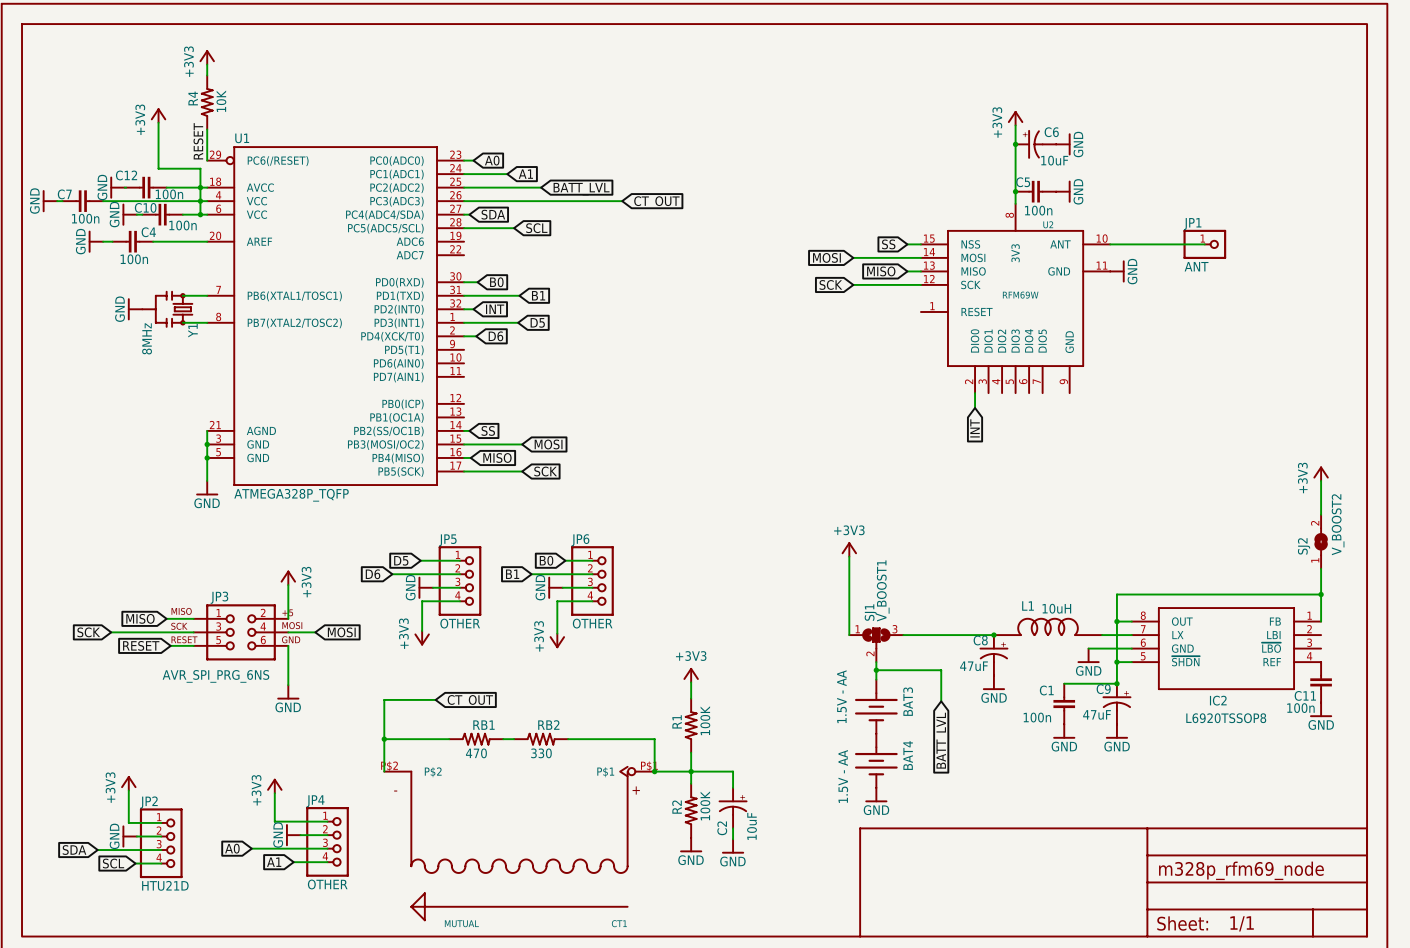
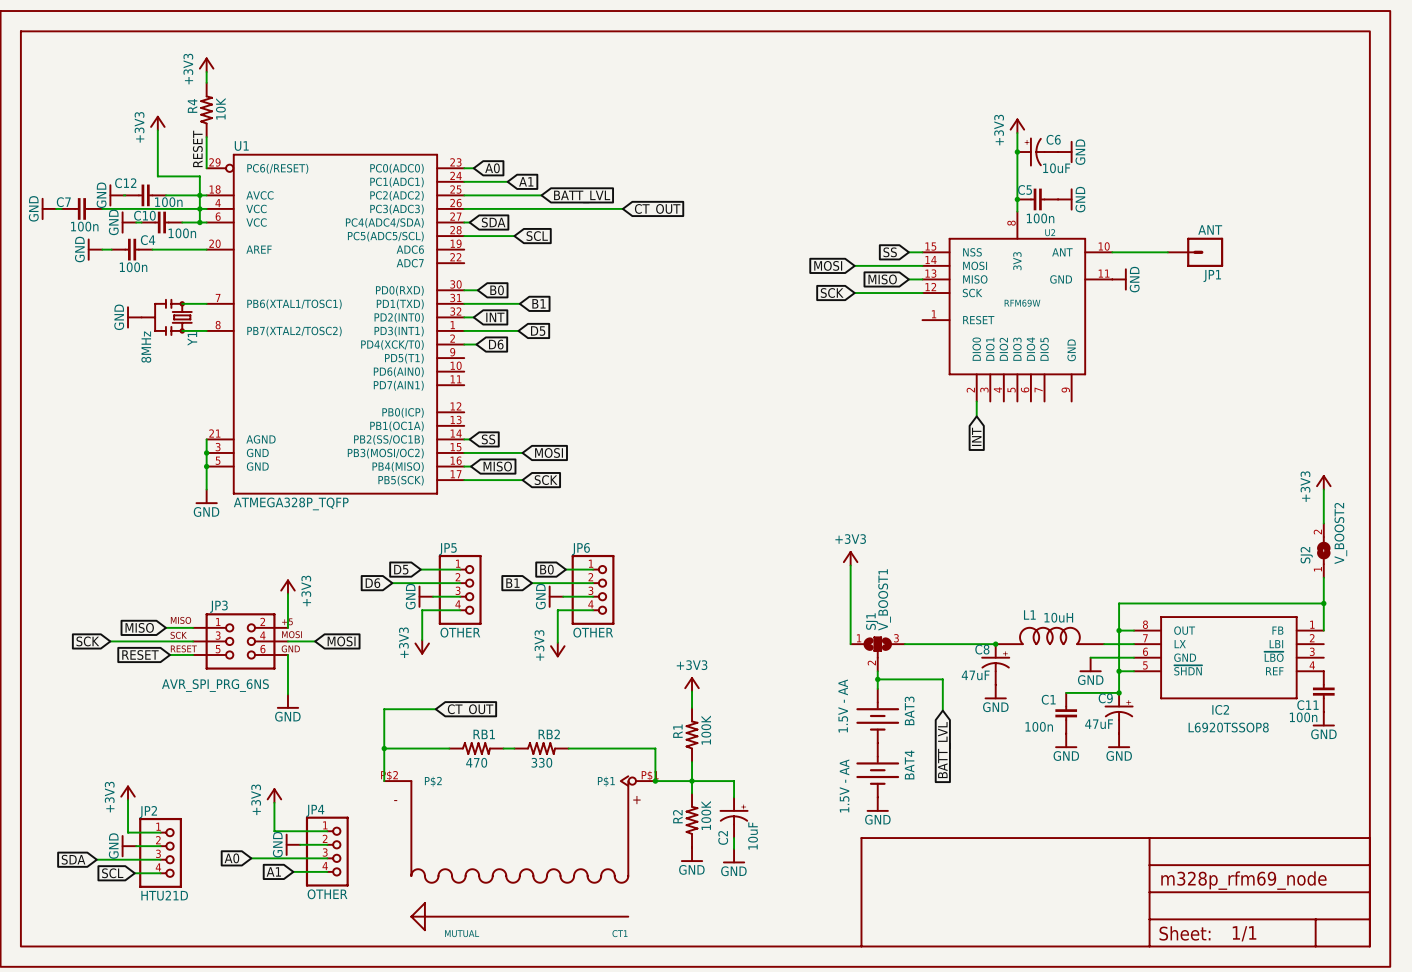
JP1 name position: JP1 (1192, 224) -> JP1 (1212, 276)
JP1 symbol: [1183, 229, 1227, 260] -> [1167, 237, 1224, 267]
JP1 value position: ANT (1196, 266) -> ANT (1210, 229)

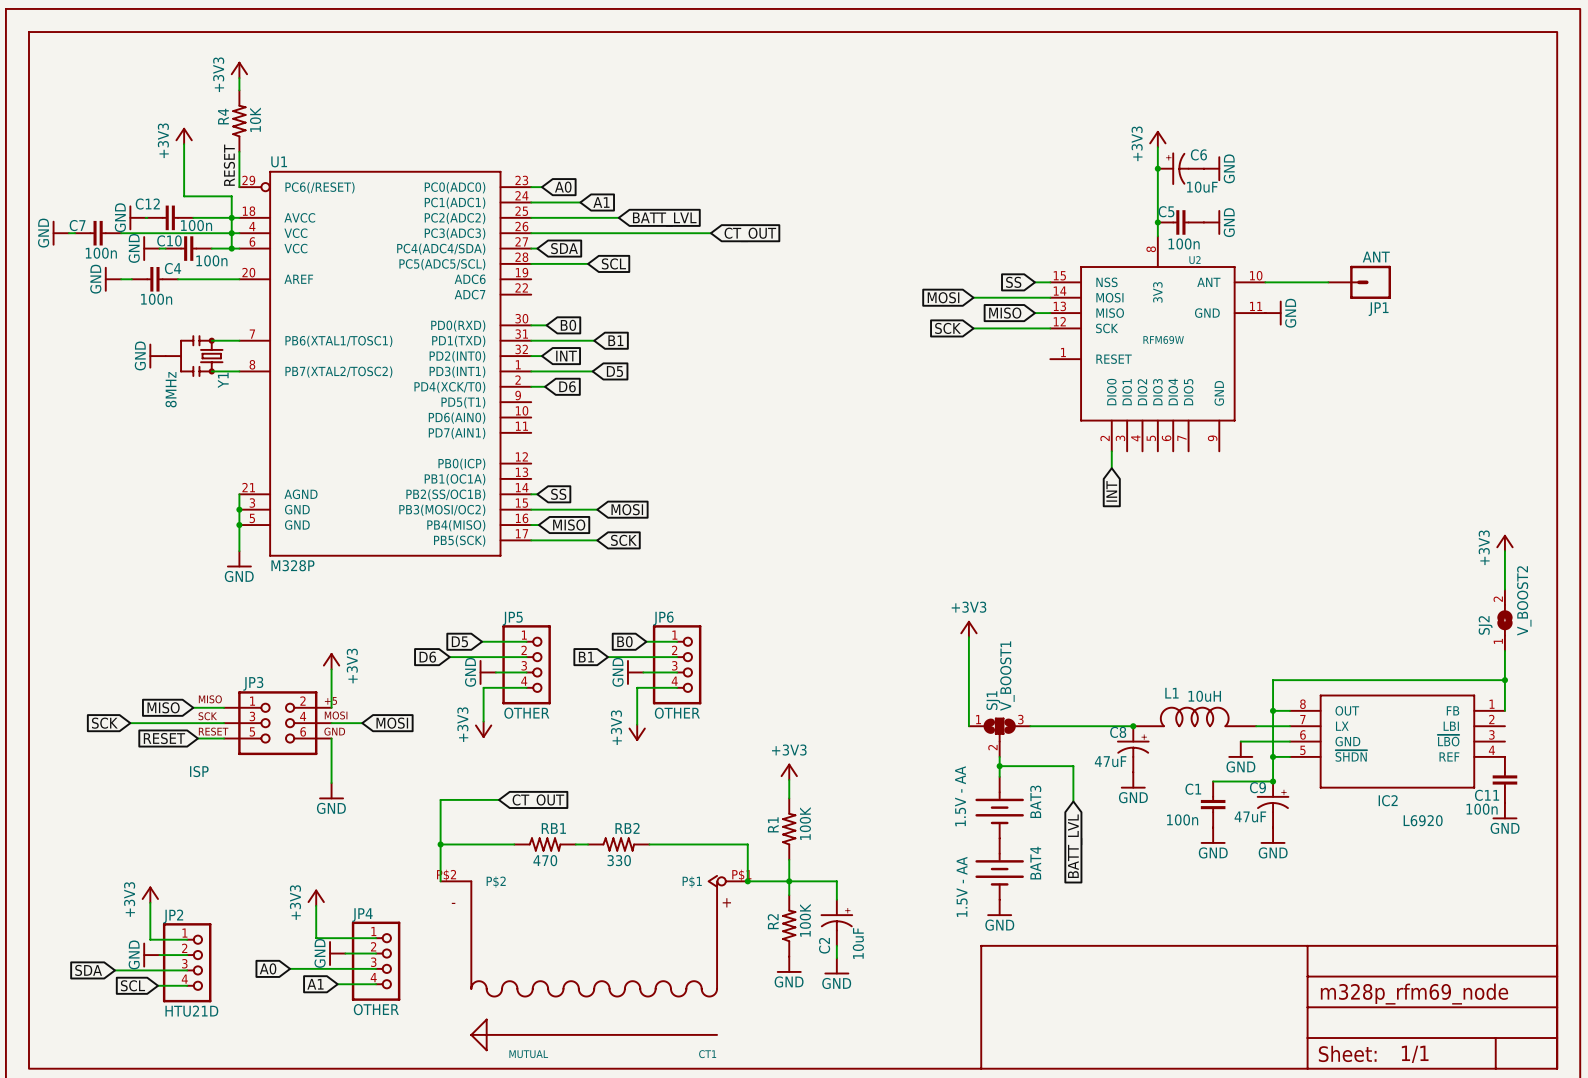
U1 value: ATMEGA328P_TQFP (291, 503) -> M328P (292, 565)
JP3 value: AVR_SPI_PRG_6NS (215, 685) -> ISP (199, 771)
IC2 value: L6920TSSOP8 (1228, 727) -> L6920 (1423, 820)

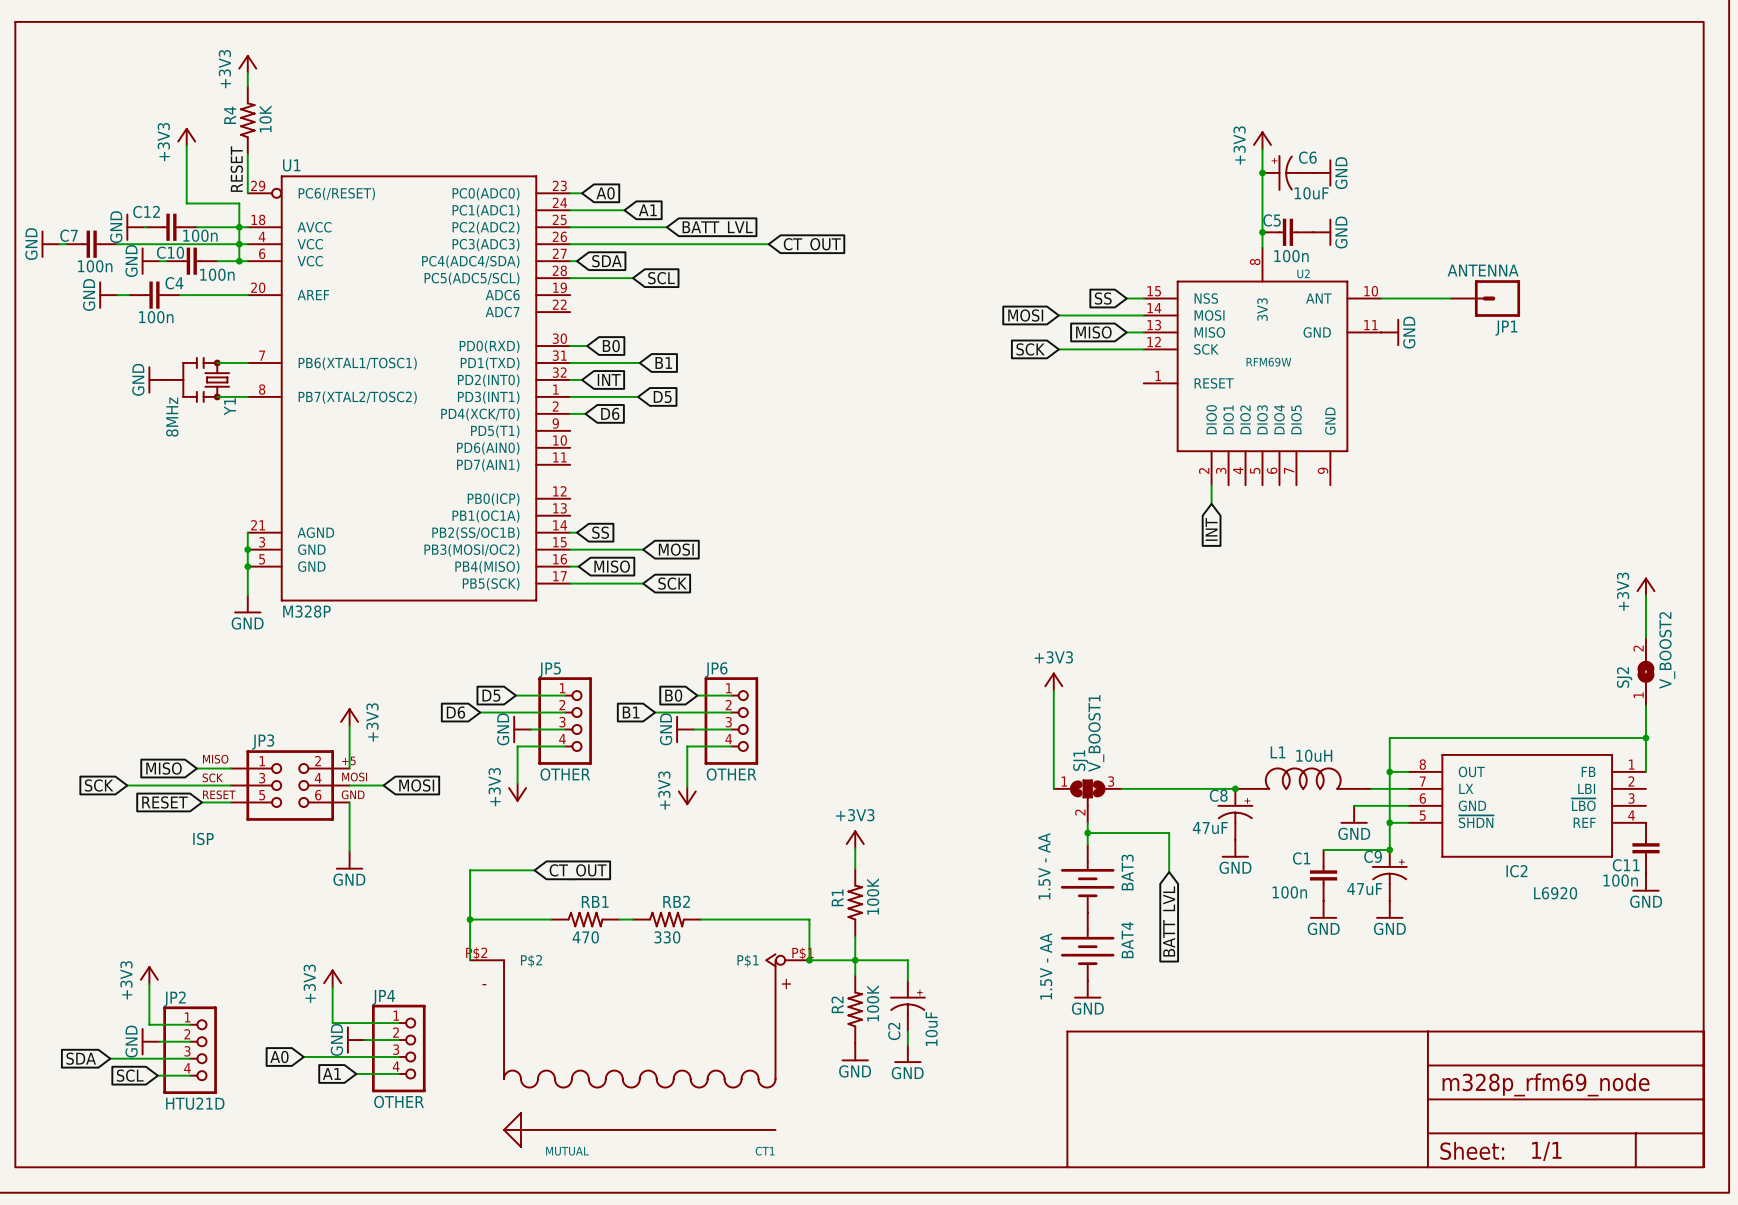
JP1 value: ANT (1376, 257) -> ANTENNA (1483, 270)

